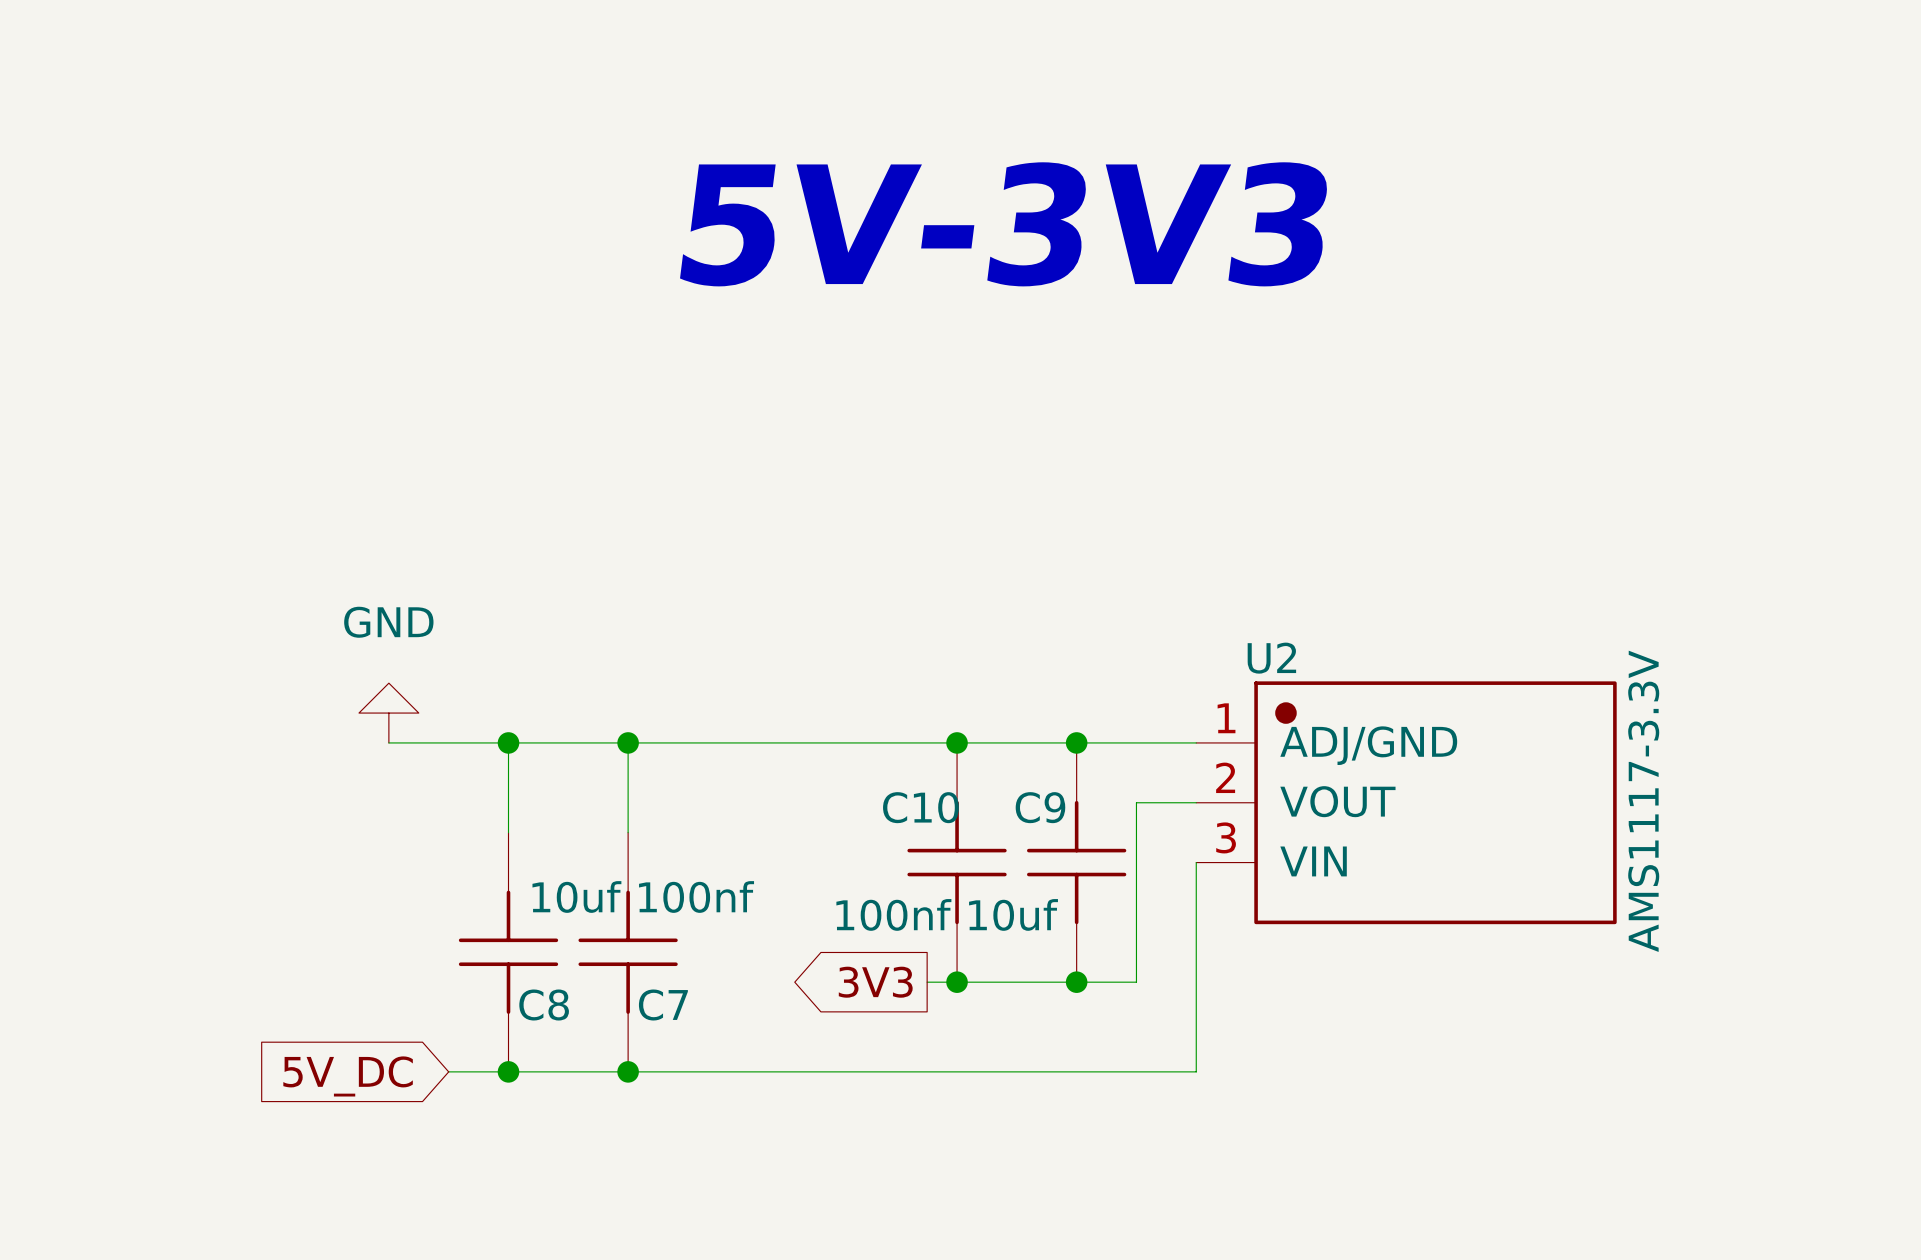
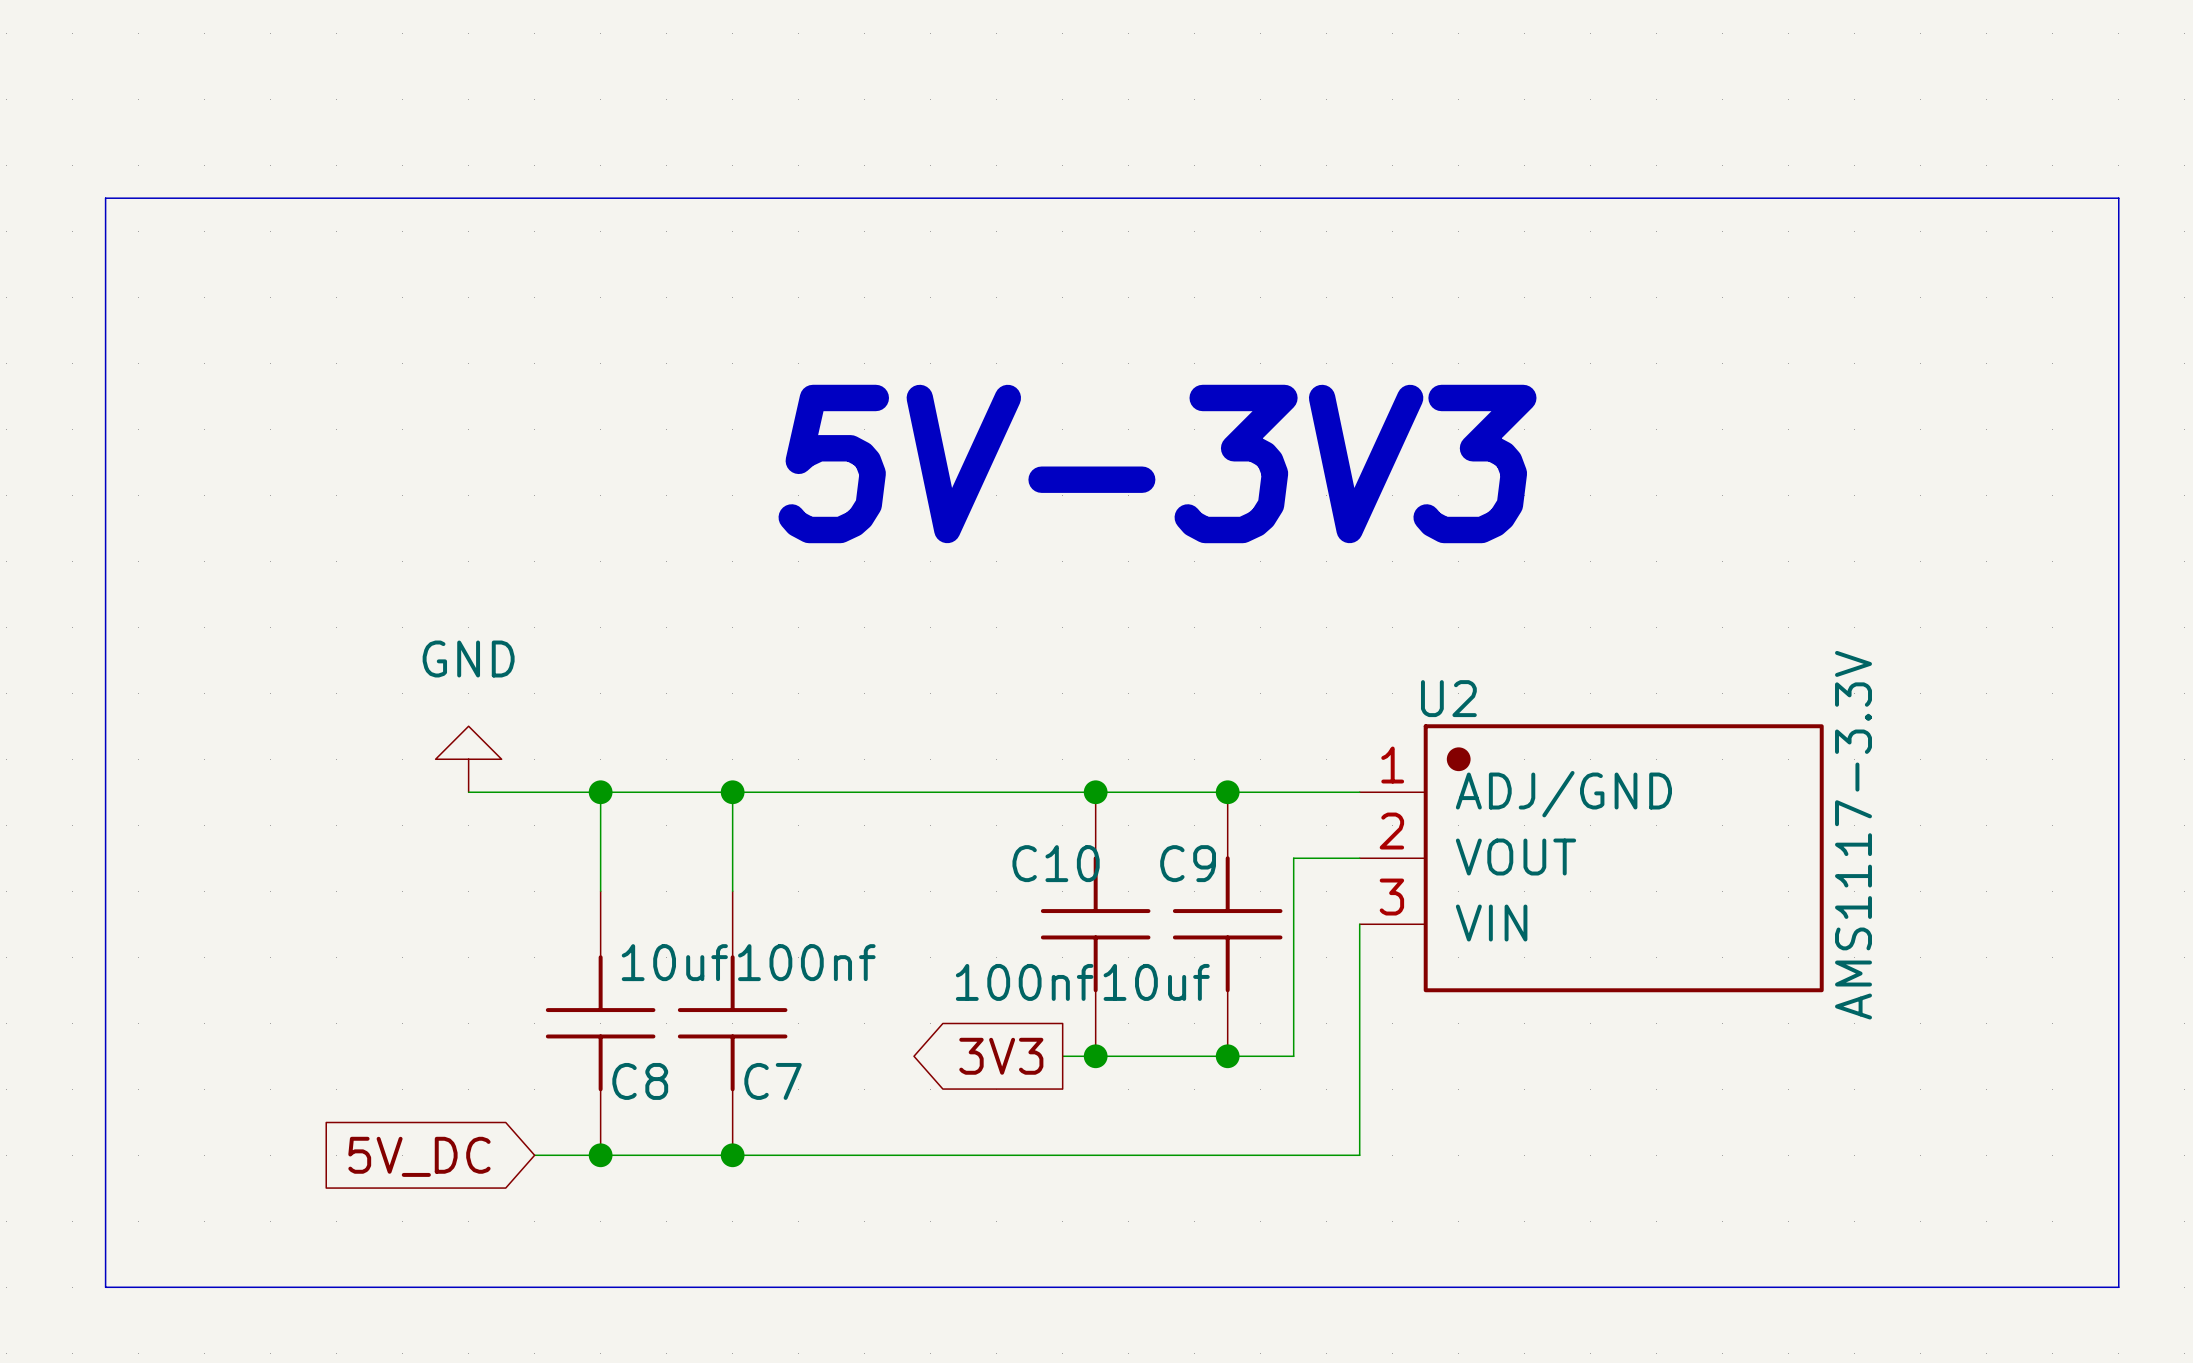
bus: none -> (105, 198) (105, 1287) (2118, 1287) (2118, 198) (105, 198)
text position: 5V-3V3 (1004, 224) -> 5V-3V3 (1157, 463)

